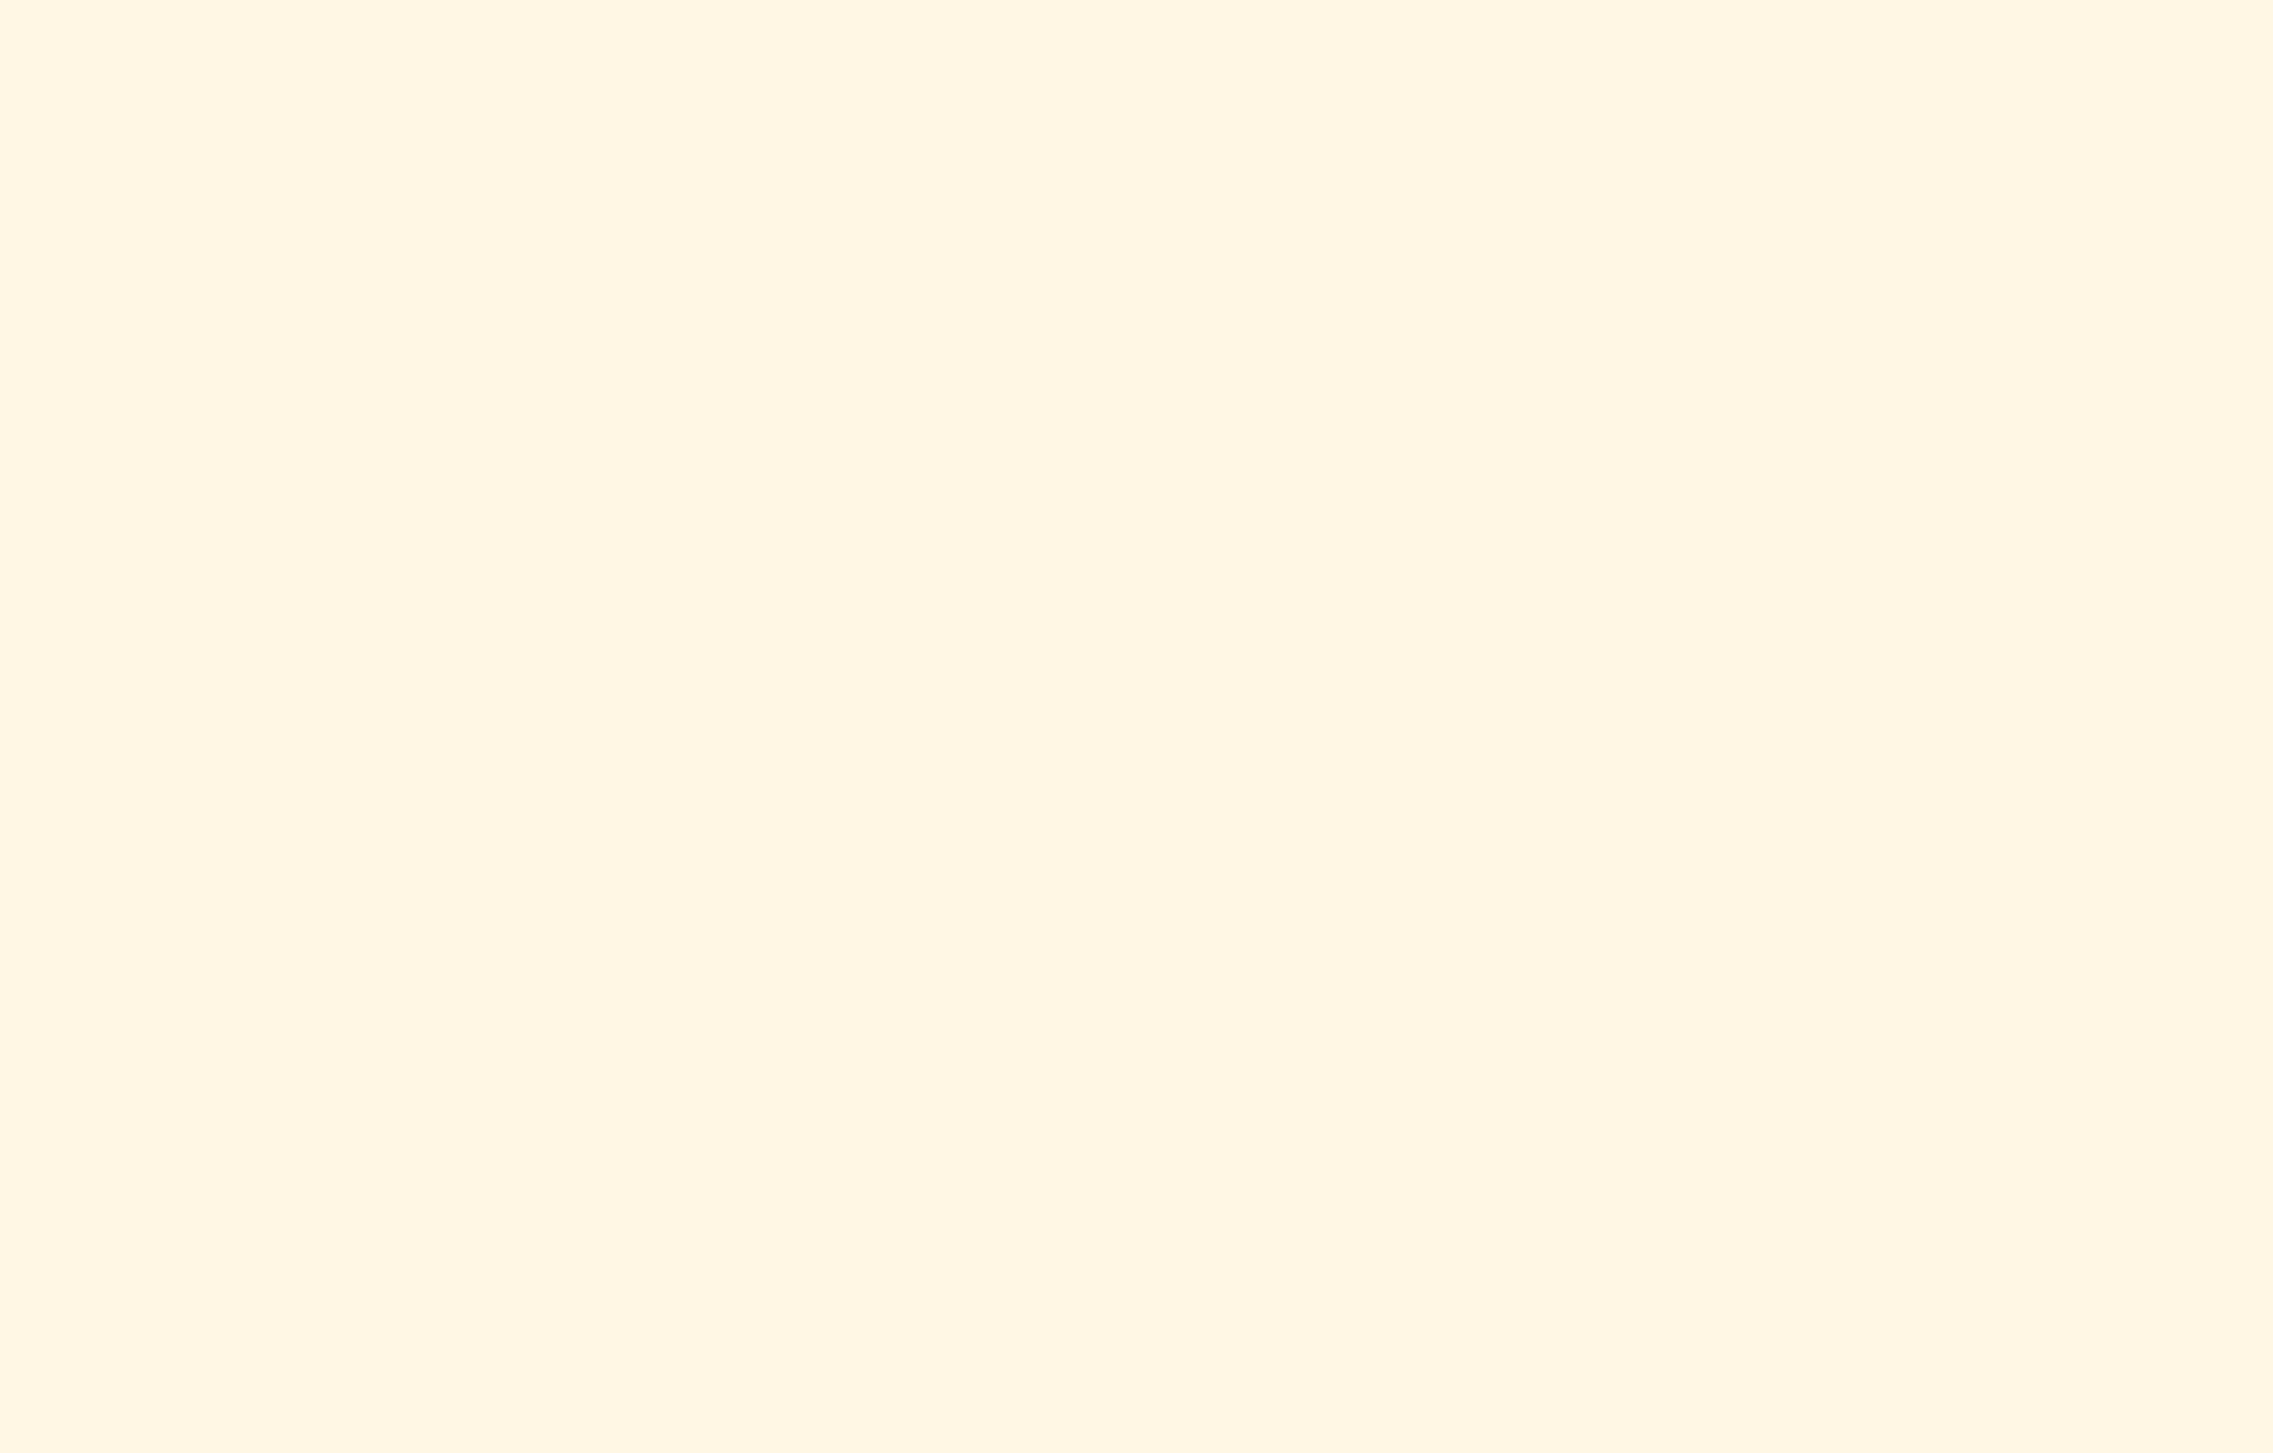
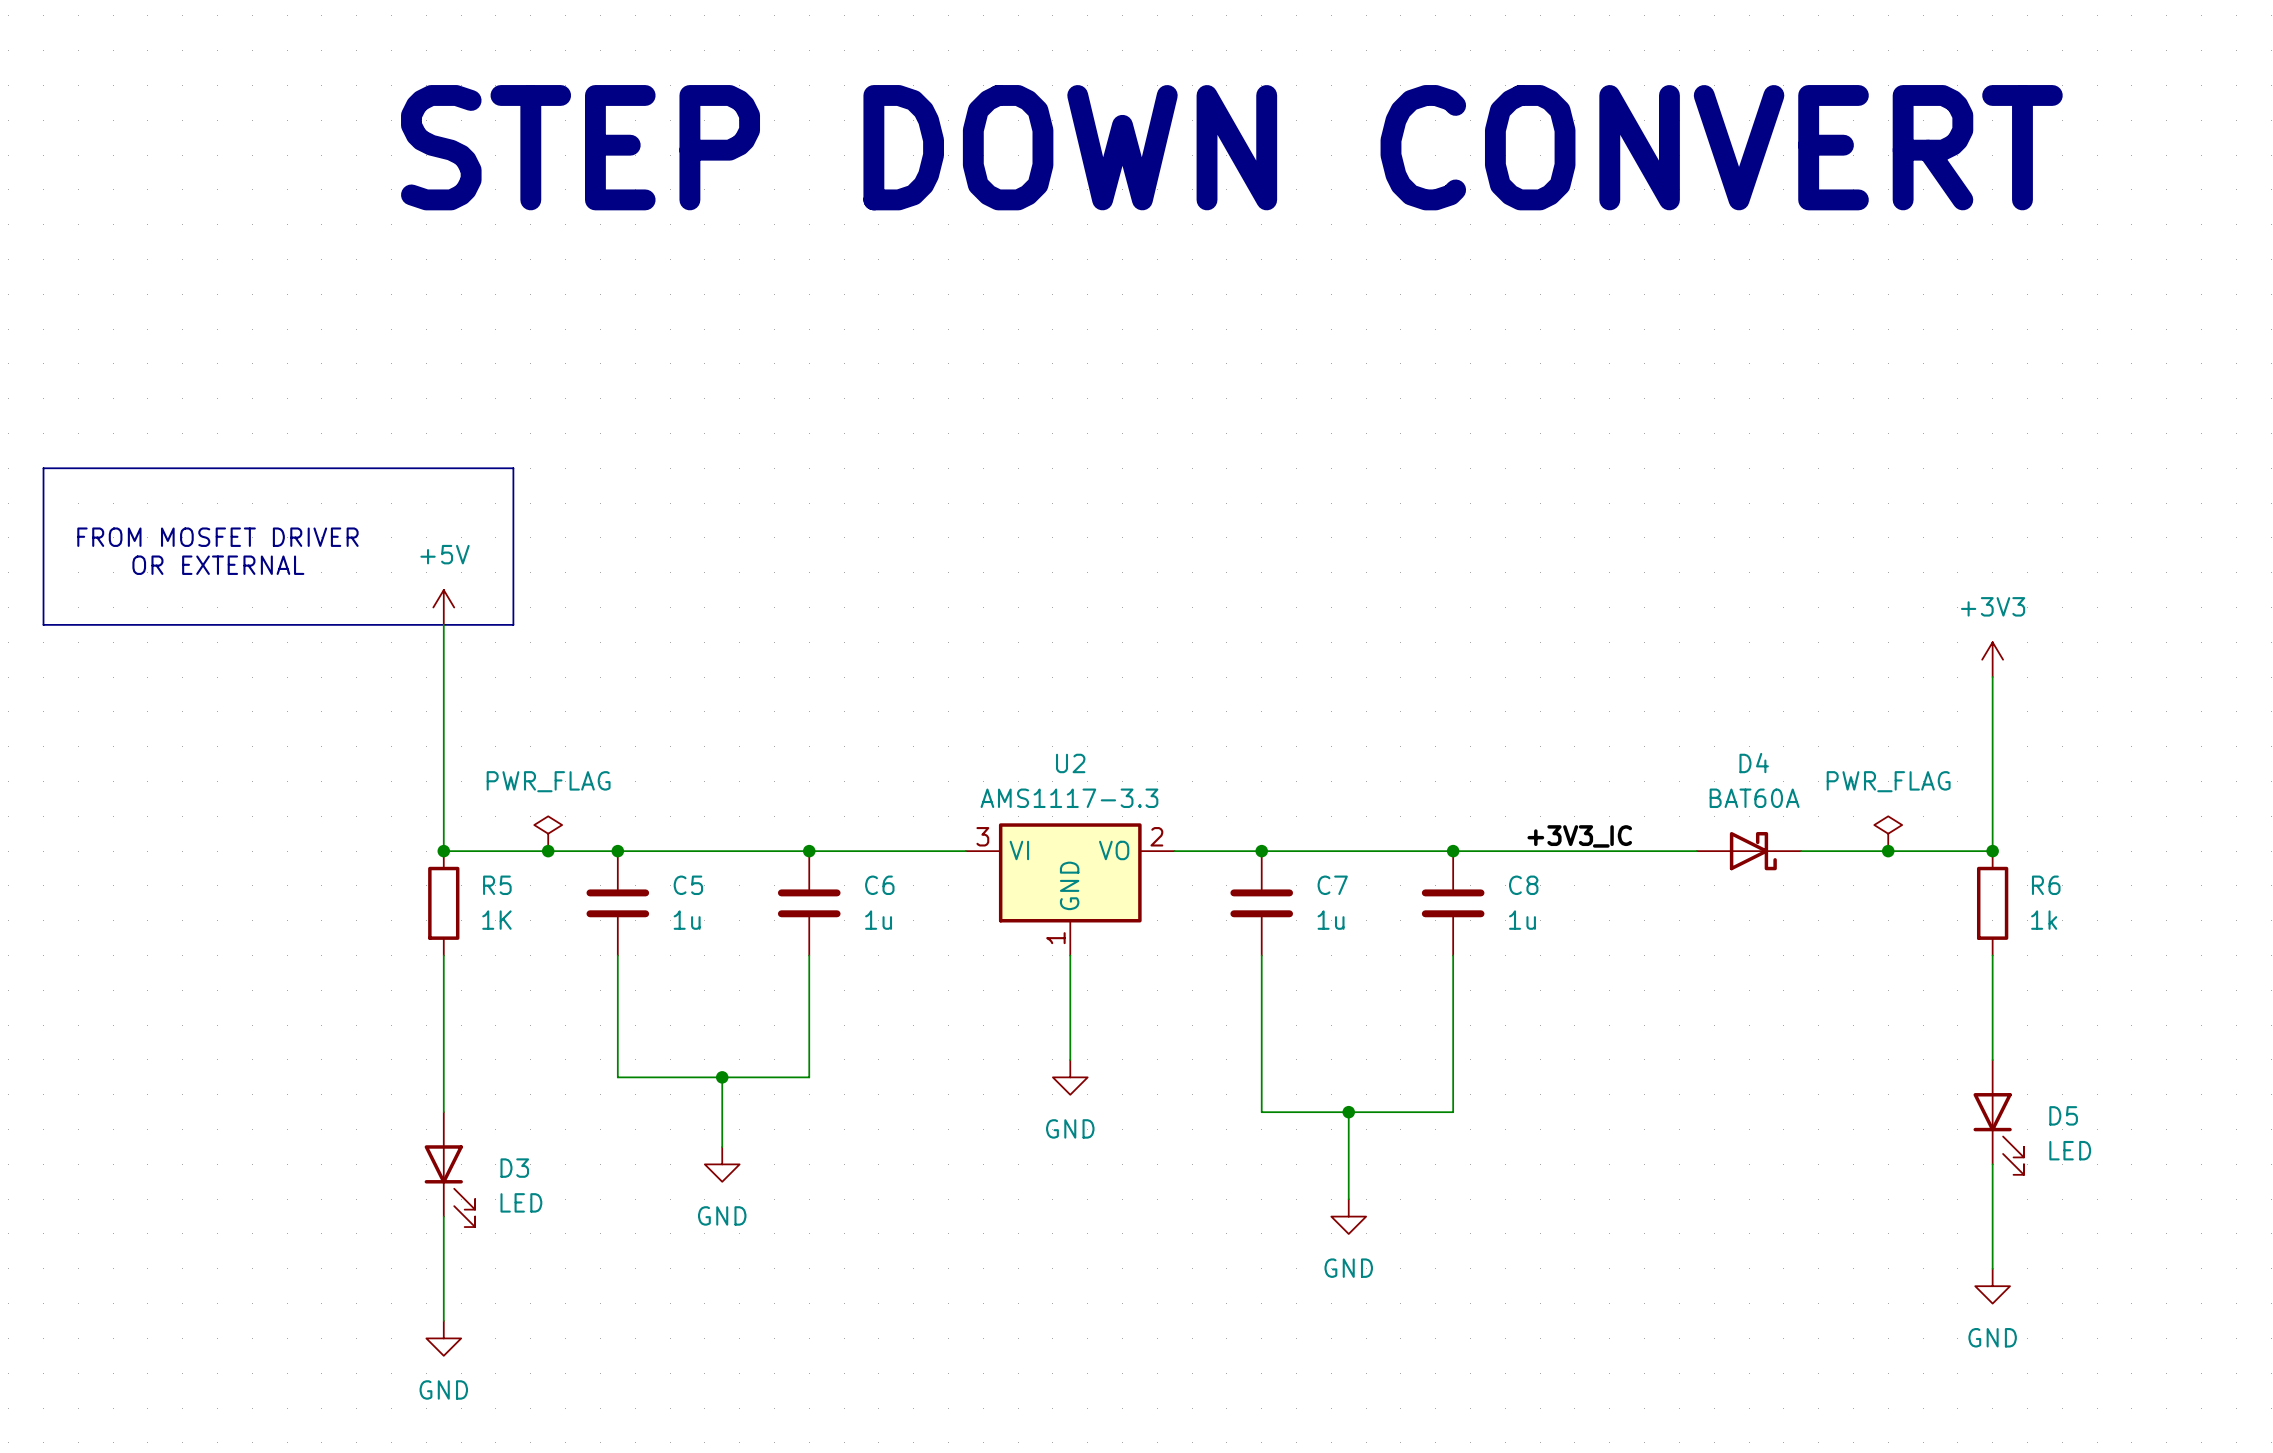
text: none -> STEP DOWN CONVERT (1231, 147)
line: none -> (43, 468) (513, 468) (513, 624) (43, 624) (43, 468)
text: none -> FROM MOSFET DRIVER (217, 537)
text: none -> OR EXTERNAL (218, 565)
power symbol: none -> +5V (443, 607)
wire: none -> (443, 624) (443, 851) (965, 851)
power symbol: none -> +3V3 (1992, 659)
wire: none -> (1992, 677) (1992, 851) (1801, 851)
power symbol: none -> PWR_FLAG (548, 833)
power symbol: none -> PWR_FLAG (1888, 833)
label: none -> +3V3_IC (1579, 836)
junction: none -> (443, 851)
junction: none -> (548, 851)
junction: none -> (617, 851)
junction: none -> (809, 851)
wire: none -> (1174, 851) (1696, 851)
junction: none -> (1261, 851)
junction: none -> (1453, 851)
D4: none -> BAT60A (1749, 851)
junction: none -> (1888, 851)
junction: none -> (1992, 851)
U2: none -> AMS1117-3.3 (1070, 889)
R5: none -> 1K (443, 903)
C5: none -> 1u (617, 903)
C6: none -> 1u (809, 903)
C7: none -> 1u (1261, 903)
C8: none -> 1u (1453, 903)
R6: none -> 1k (1992, 903)
wire: none -> (443, 955) (443, 1112)
wire: none -> (617, 955) (617, 1077) (809, 1077) (809, 955)
wire: none -> (1070, 955) (1070, 1059)
wire: none -> (1261, 955) (1261, 1112) (1453, 1112) (1453, 955)
wire: none -> (1992, 955) (1992, 1059)
wire: none -> (722, 1077) (722, 1146)
junction: none -> (722, 1077)
power symbol: none -> GND (1070, 1077)
wire: none -> (1348, 1112) (1348, 1199)
junction: none -> (1348, 1112)
D5: none -> LED (1998, 1117)
power symbol: none -> GND (722, 1164)
wire: none -> (1992, 1164) (1992, 1268)
D3: none -> LED (449, 1169)
wire: none -> (443, 1216) (443, 1321)
power symbol: none -> GND (1348, 1216)
power symbol: none -> GND (1992, 1286)
power symbol: none -> GND (443, 1338)

